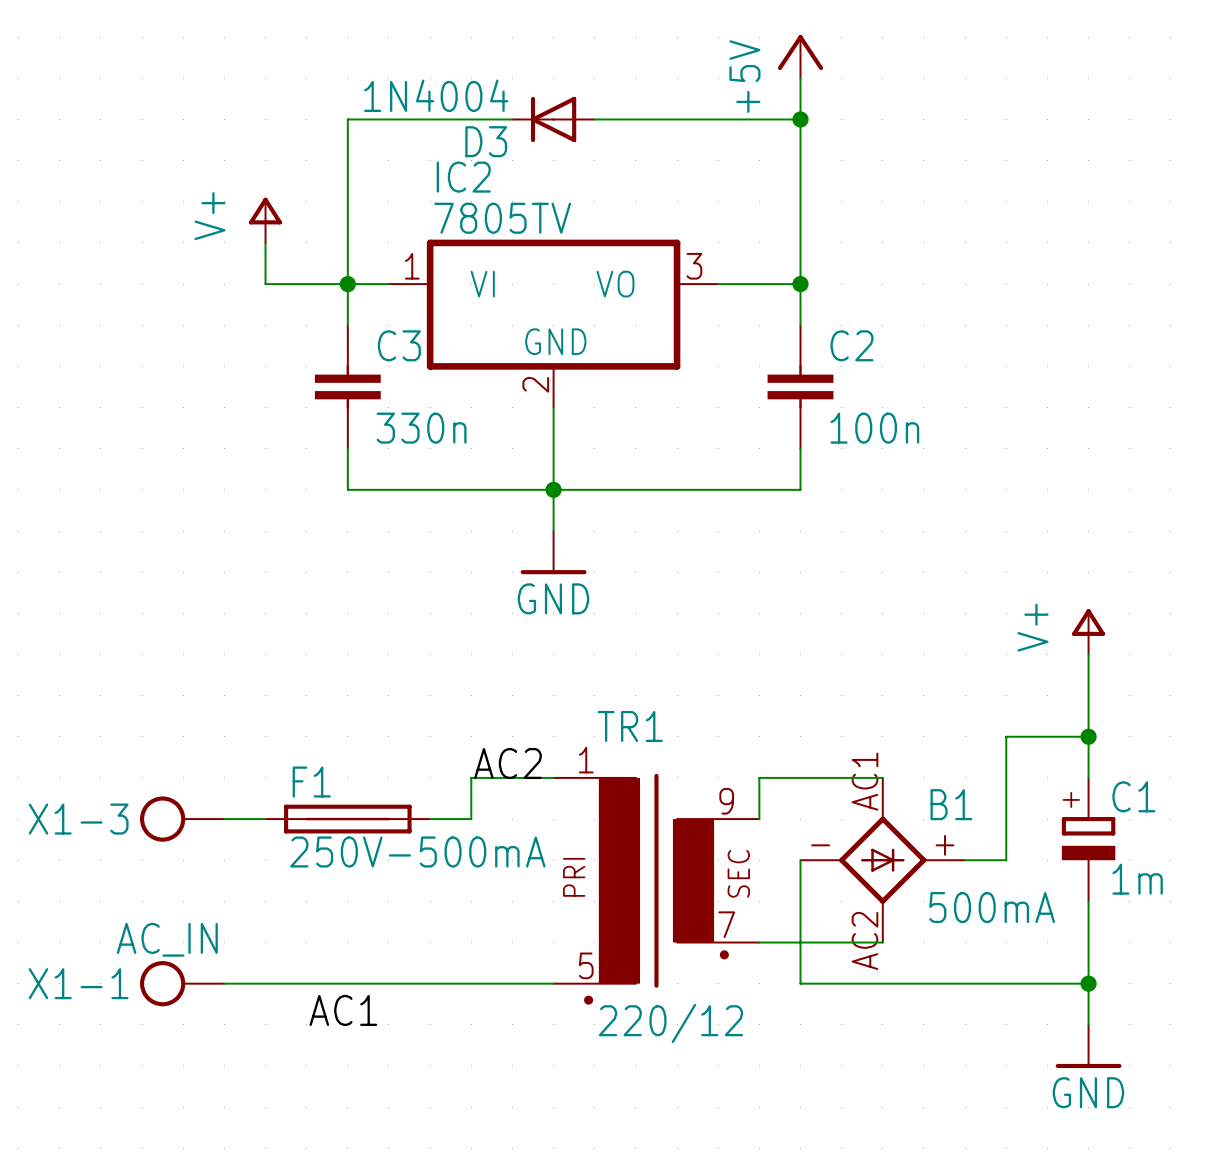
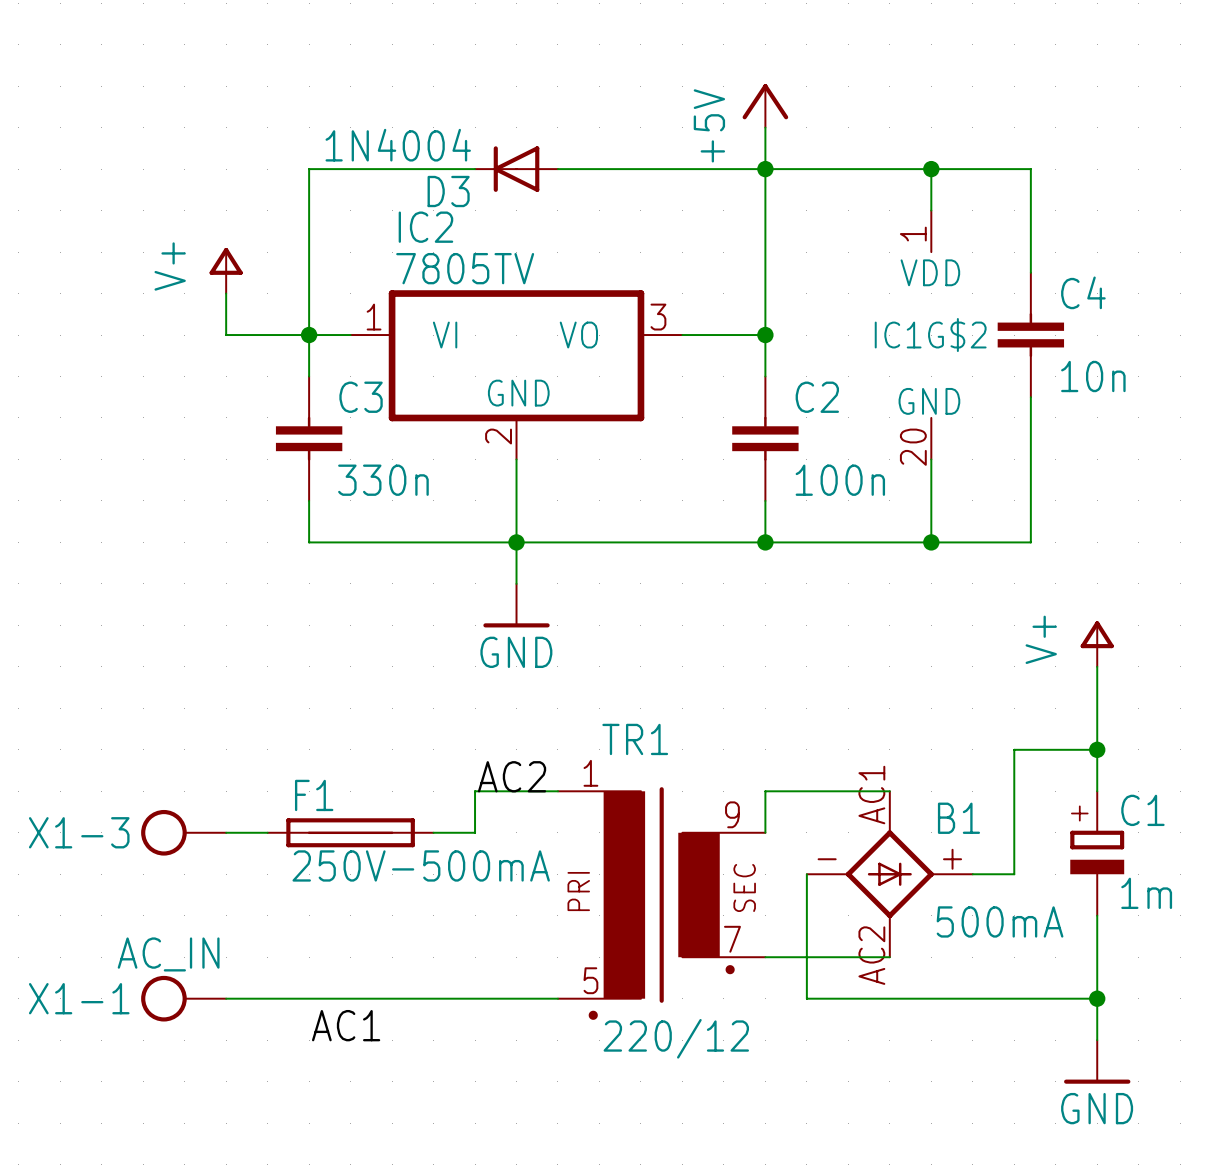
power symbol position: +5V (800, 56) -> +5V (765, 105)
wire: (800, 78) (800, 325) -> (765, 127) (765, 376)
wire: (512, 119) (347, 119) (347, 325) -> (226, 293) (226, 335) (350, 335)
D3 position: (553, 119) -> (516, 169)
wire: (594, 119) (800, 119) -> none
junction position: (800, 119) -> (765, 169)
wire: none -> (475, 169) (309, 169) (309, 376)
wire: none -> (557, 169) (1030, 169) (1030, 272)
wire: none -> (931, 169) (931, 210)
junction: none -> (931, 169)
power symbol position: V+ (265, 220) -> V+ (226, 270)
wire: (265, 242) (265, 284) (388, 284) -> none
junction position: (347, 284) -> (309, 335)
wire: (718, 284) (800, 284) -> (682, 335) (765, 335)
junction position: (800, 284) -> (765, 335)
IC2 position: (553, 323) -> (516, 374)
IC1G$2: none -> (931, 335)
C4: none -> 10n (1030, 335)
C3 position: (347, 386) -> (309, 438)
C2 position: (800, 386) -> (765, 438)
wire: none -> (1030, 397) (1030, 542) (309, 542) (309, 500)
wire: (553, 407) (553, 531) -> (516, 459) (516, 583)
wire: (347, 448) (347, 489) (800, 489) (800, 448) -> none
wire: none -> (931, 459) (931, 542)
junction position: (553, 489) -> (516, 542)
wire: none -> (765, 500) (765, 542)
junction: none -> (765, 542)
junction: none -> (931, 542)
power symbol position: GND (553, 552) -> GND (516, 605)

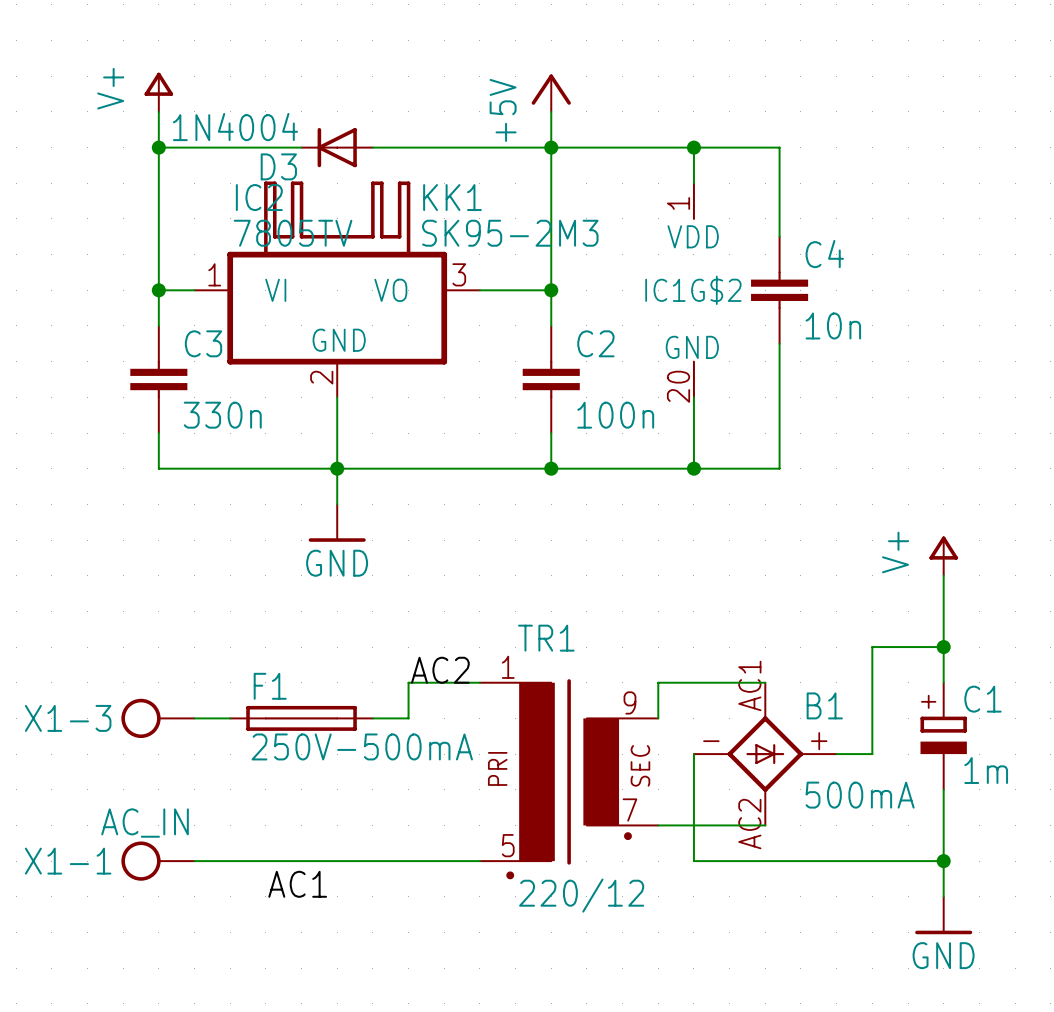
power symbol position: +5V (765, 105) -> +5V (551, 93)
wire: none -> (158, 111) (158, 325)
wire: (765, 127) (765, 376) -> (551, 111) (551, 325)
junction: none -> (158, 147)
wire: (309, 169) (309, 376) -> (265, 147) (158, 147)
D3 position: (516, 169) -> (337, 147)
junction: none -> (551, 147)
junction position: (765, 169) -> (693, 147)
wire: (906, 169) (1030, 169) (1030, 272) -> (779, 147) (779, 236)
wire: (931, 169) (931, 210) -> (693, 147) (693, 183)
junction: (931, 169) -> none
KK1: none -> SK95-2M3 (337, 218)
power symbol position: V+ (226, 270) -> V+ (158, 92)
wire: (226, 293) (226, 335) (350, 335) -> none
wire: none -> (158, 290) (194, 290)
junction: none -> (158, 290)
junction: (309, 335) -> none
junction: none -> (551, 290)
wire: (682, 335) (765, 335) -> (479, 290) (551, 290)
junction: (765, 335) -> none
IC1G$2 position: (931, 335) -> (693, 290)
C4 position: (1030, 335) -> (779, 290)
IC2 position: (516, 374) -> (337, 324)
wire: (1030, 397) (1030, 542) (906, 542) -> (779, 343) (779, 468)
C3 position: (309, 438) -> (158, 379)
C2 position: (765, 438) -> (551, 379)
wire: (516, 459) (516, 583) -> (337, 397) (337, 504)
wire: (931, 459) (931, 542) -> (693, 397) (693, 468)
wire: (309, 500) (309, 542) -> (158, 433) (158, 468) (265, 468)
wire: (765, 500) (765, 542) -> (551, 433) (551, 468)
junction: none -> (337, 468)
junction: (516, 542) -> none
junction: none -> (551, 468)
junction position: (765, 542) -> (693, 468)
junction: (931, 542) -> none
power symbol position: GND (516, 605) -> GND (337, 523)

